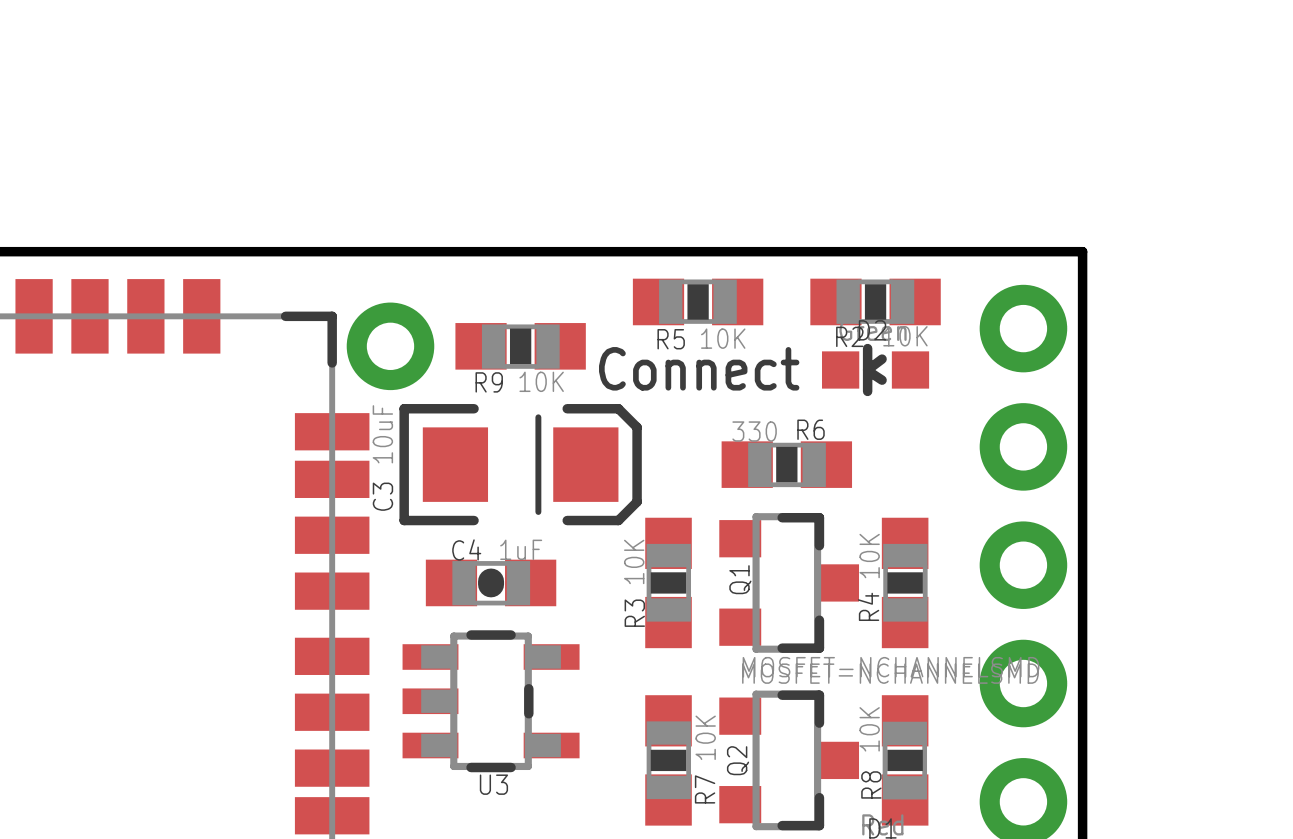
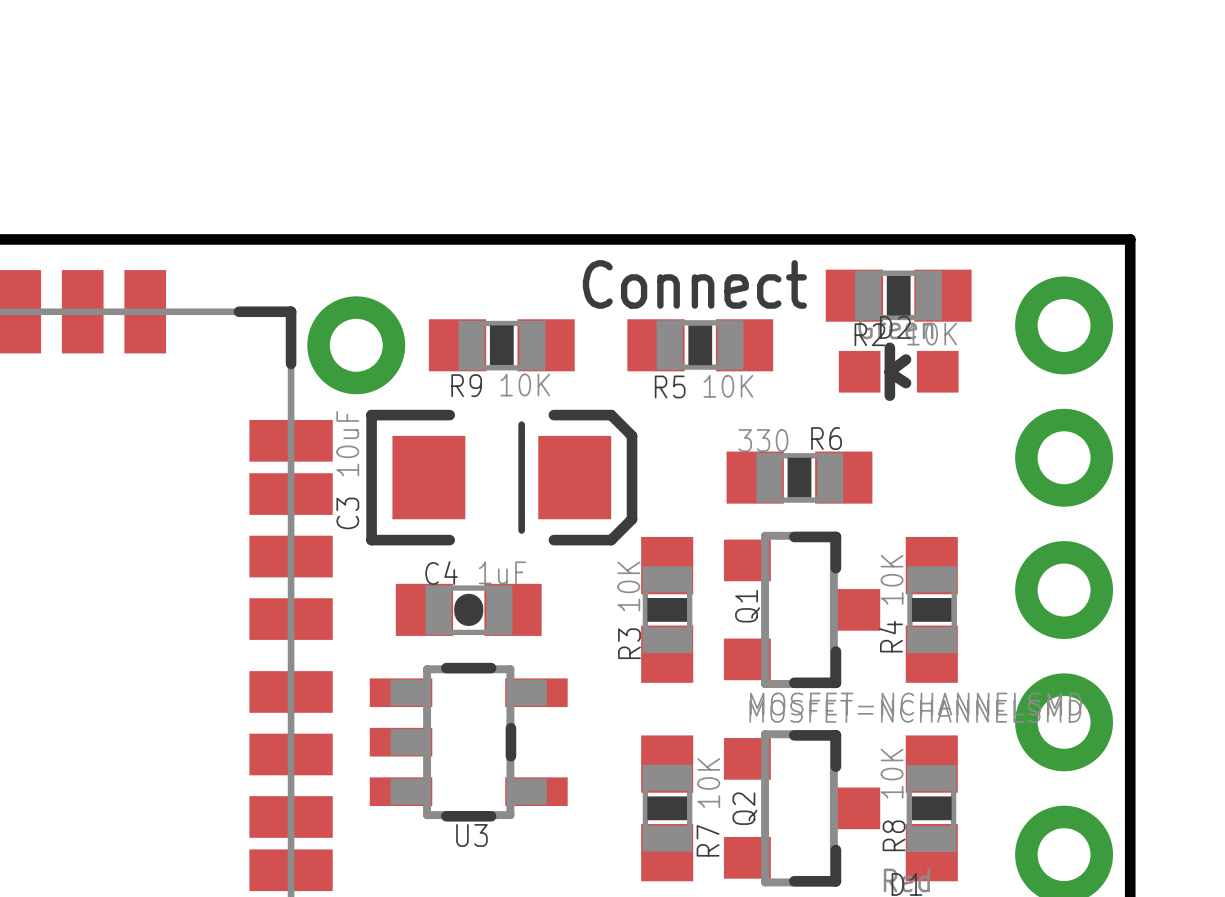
R5 position: (698, 301) -> (700, 345)
text position: Connect (699, 368) -> Connect (694, 284)

